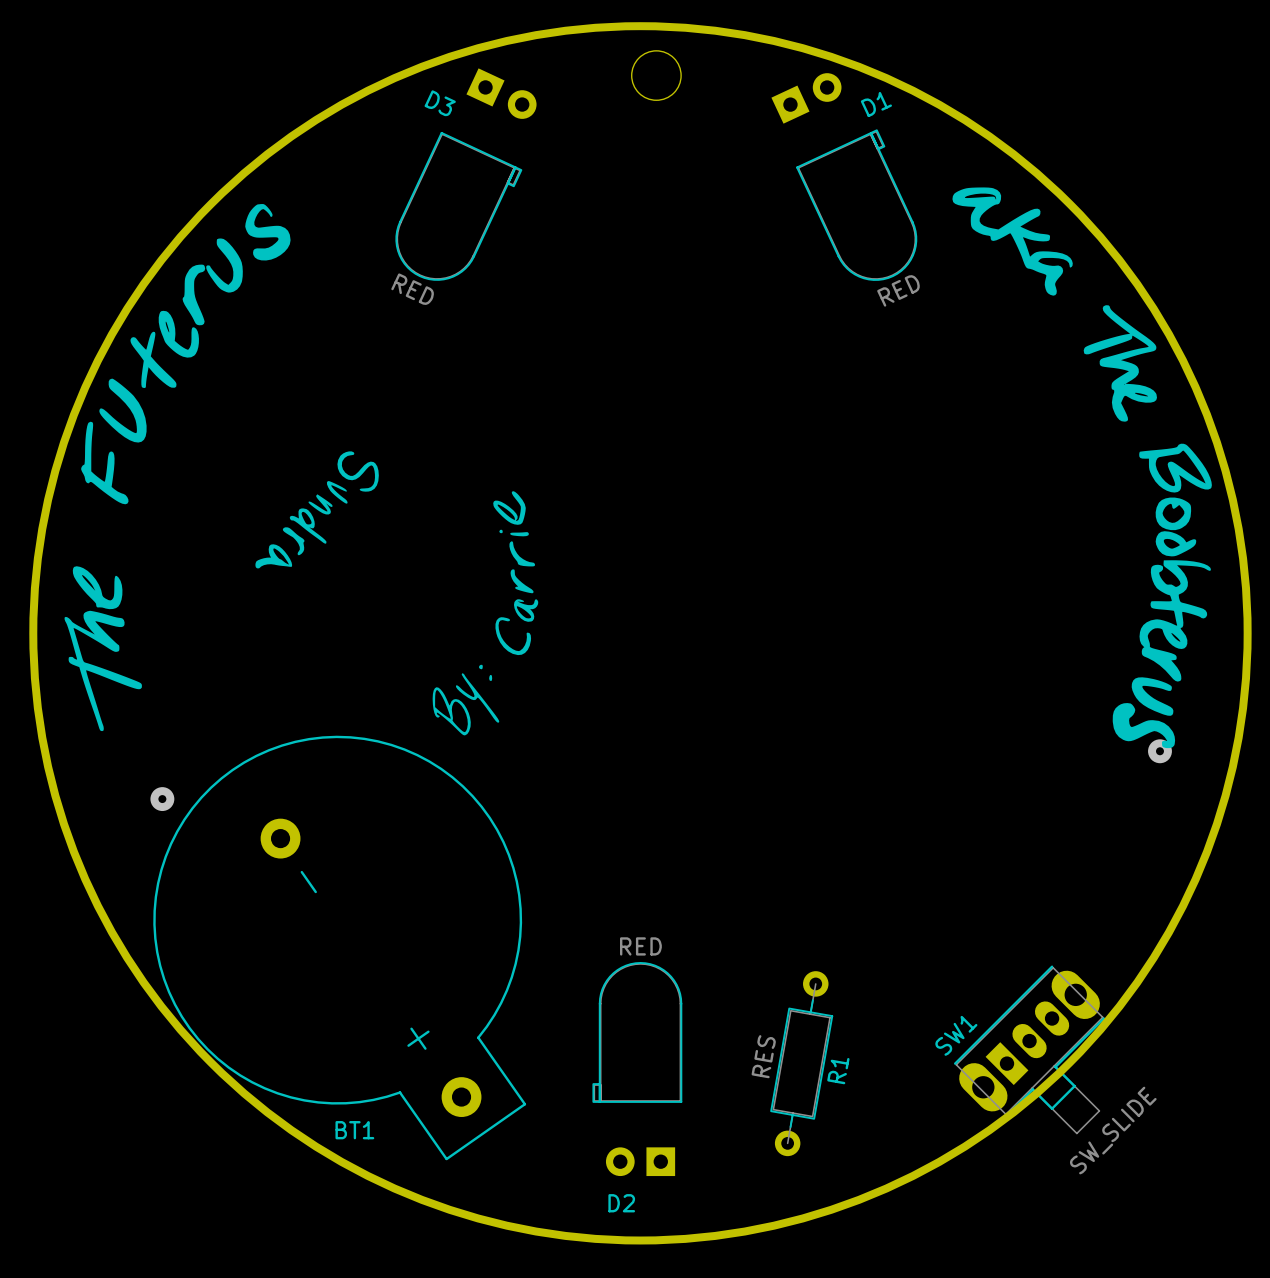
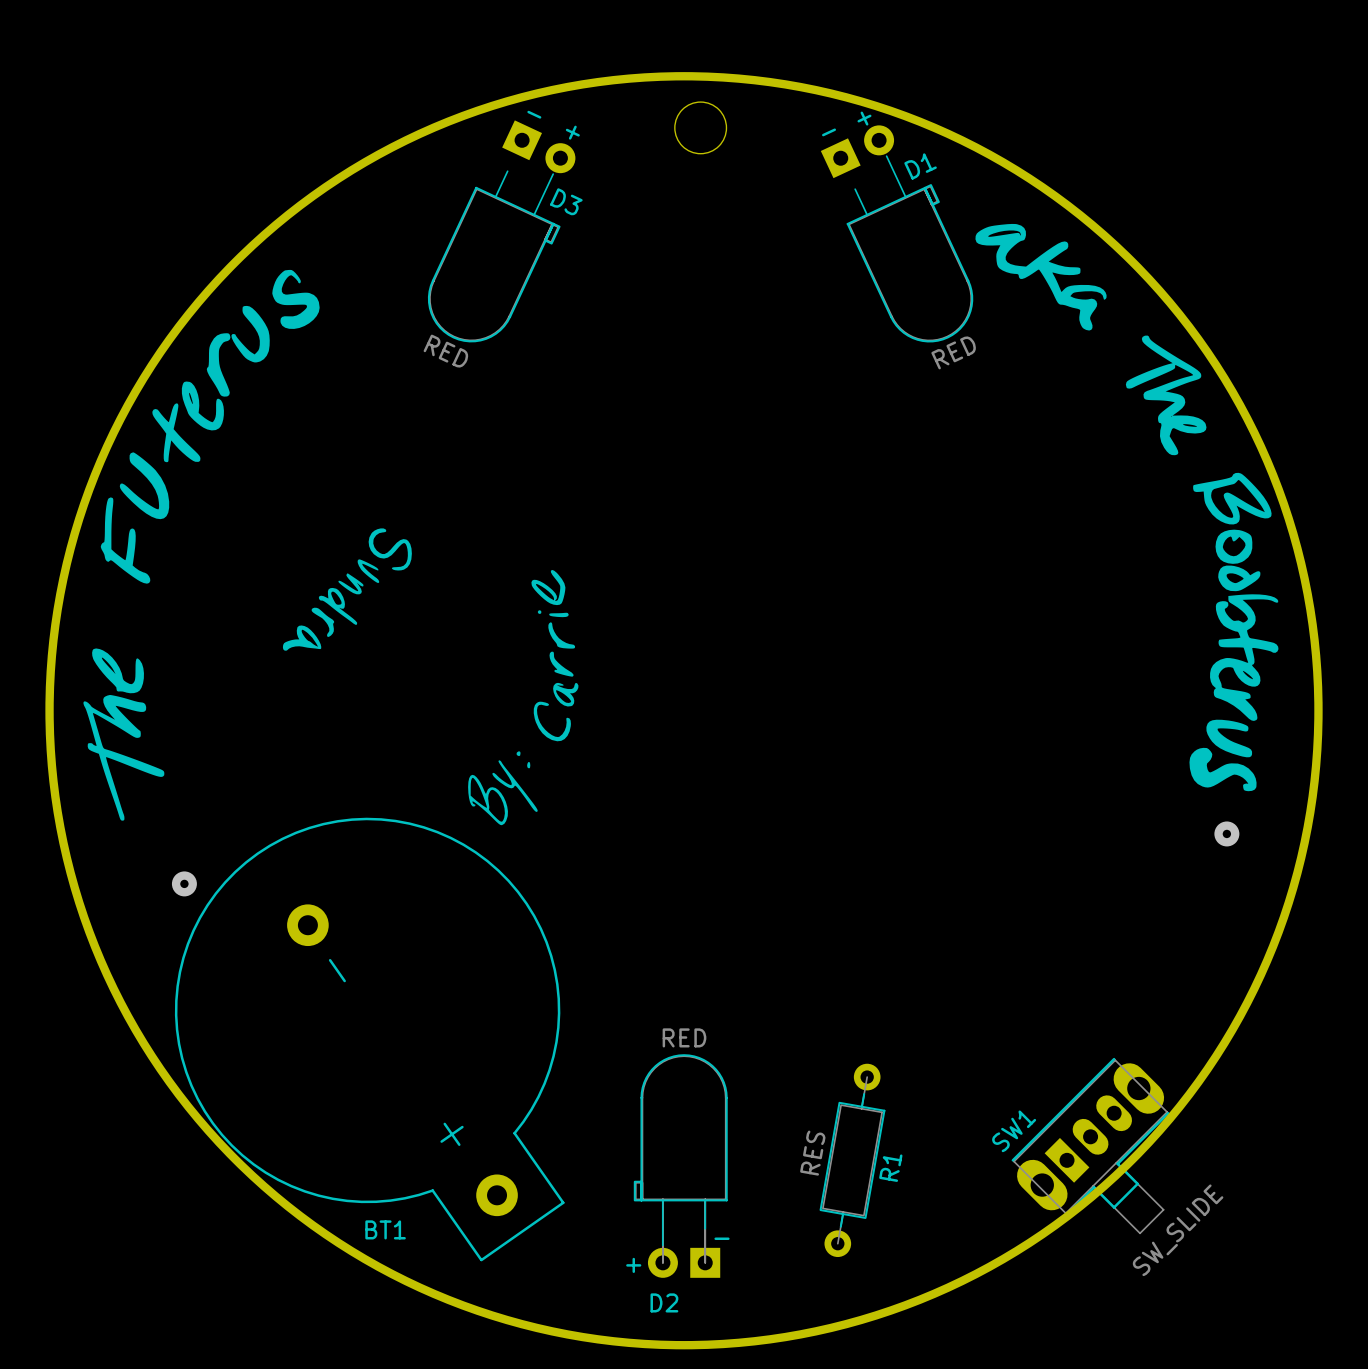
D3 footprint: [395, 68, 537, 281] -> [427, 120, 576, 343]
D1 footprint: [771, 73, 918, 281] -> [820, 125, 974, 343]
D3 name position: D3 (440, 103) -> D3 (566, 201)
drawing: none -> [975, 223, 1279, 792]
drawing: [64, 187, 1212, 749] -> none
drawing: none -> [83, 269, 579, 826]
D2 footprint: [592, 962, 683, 1177] -> [633, 1054, 728, 1278]

